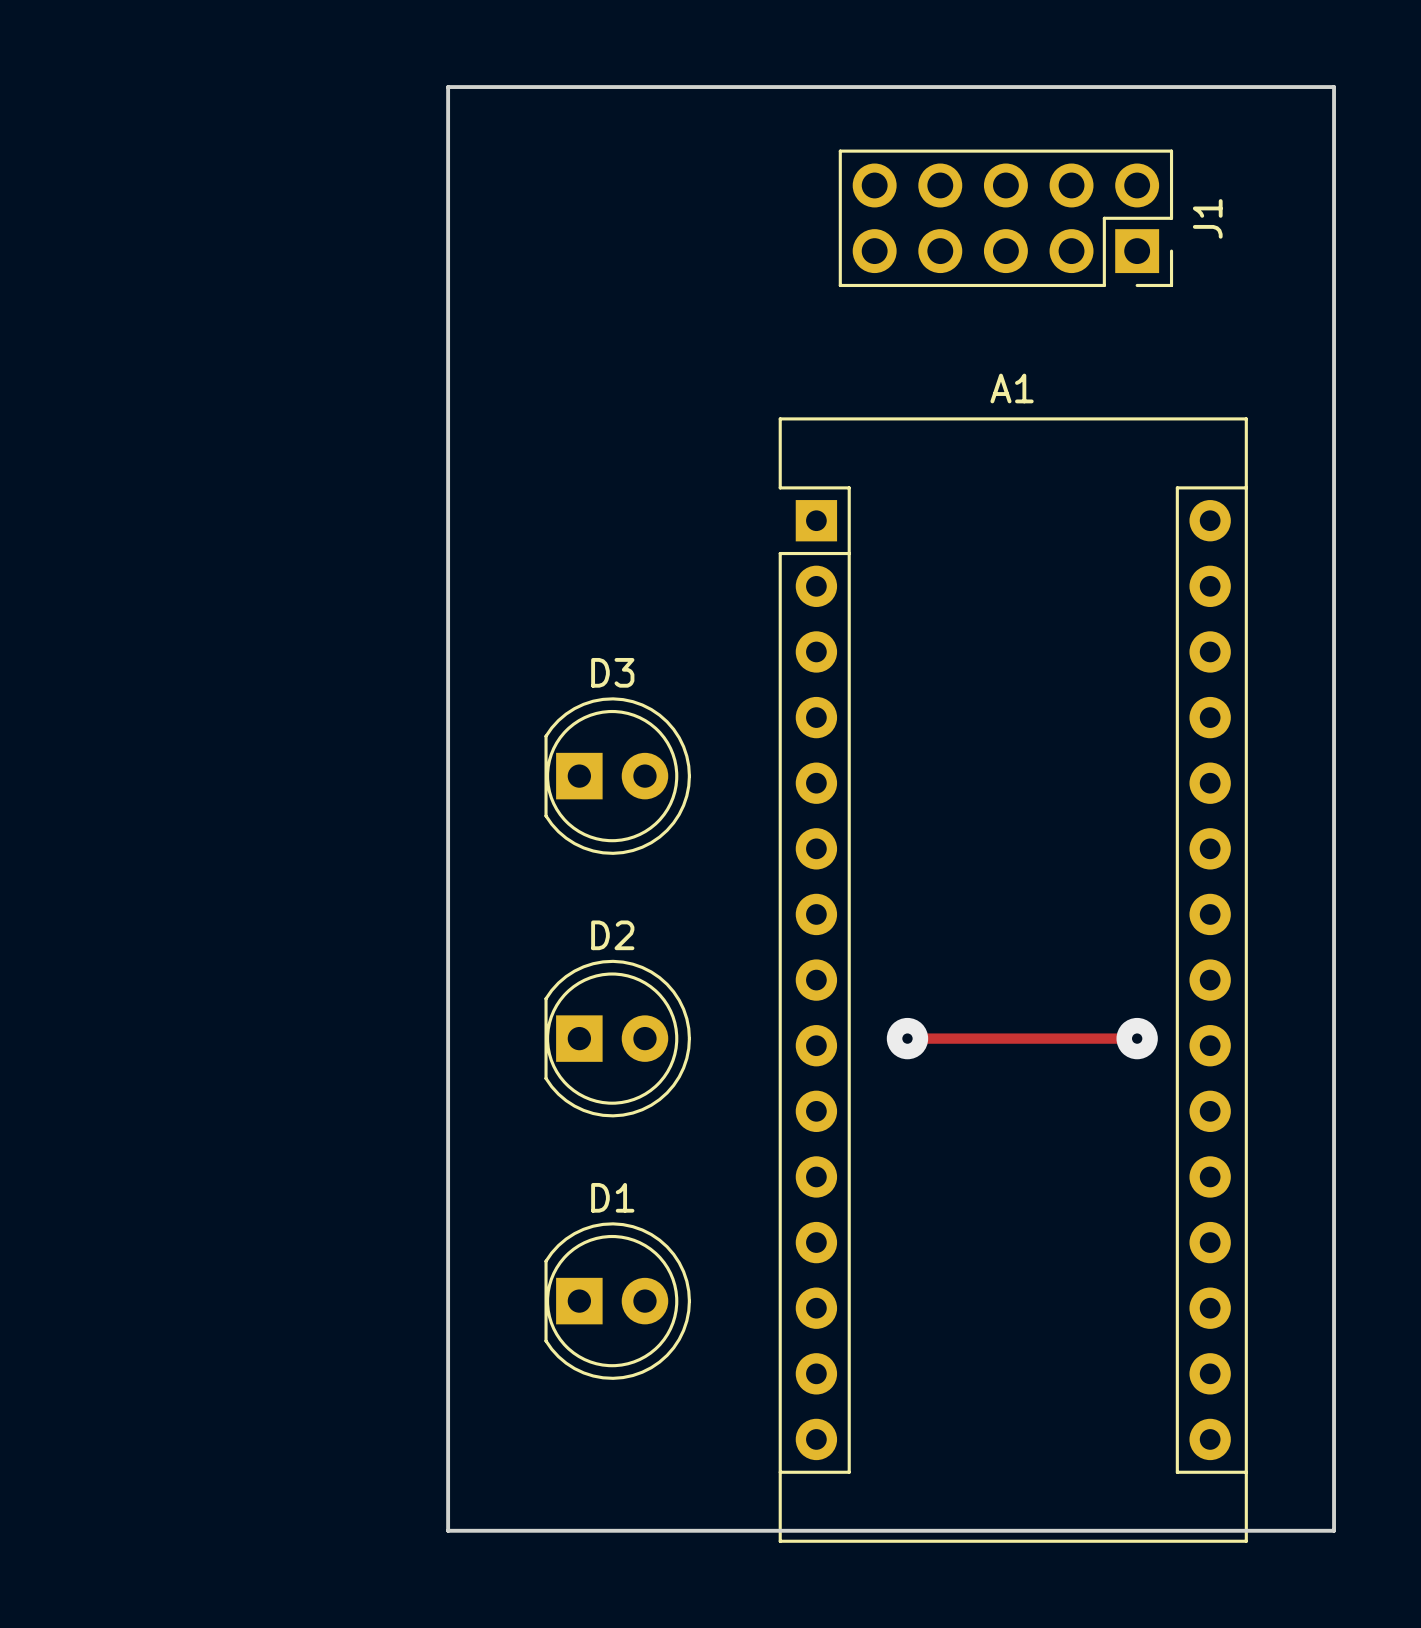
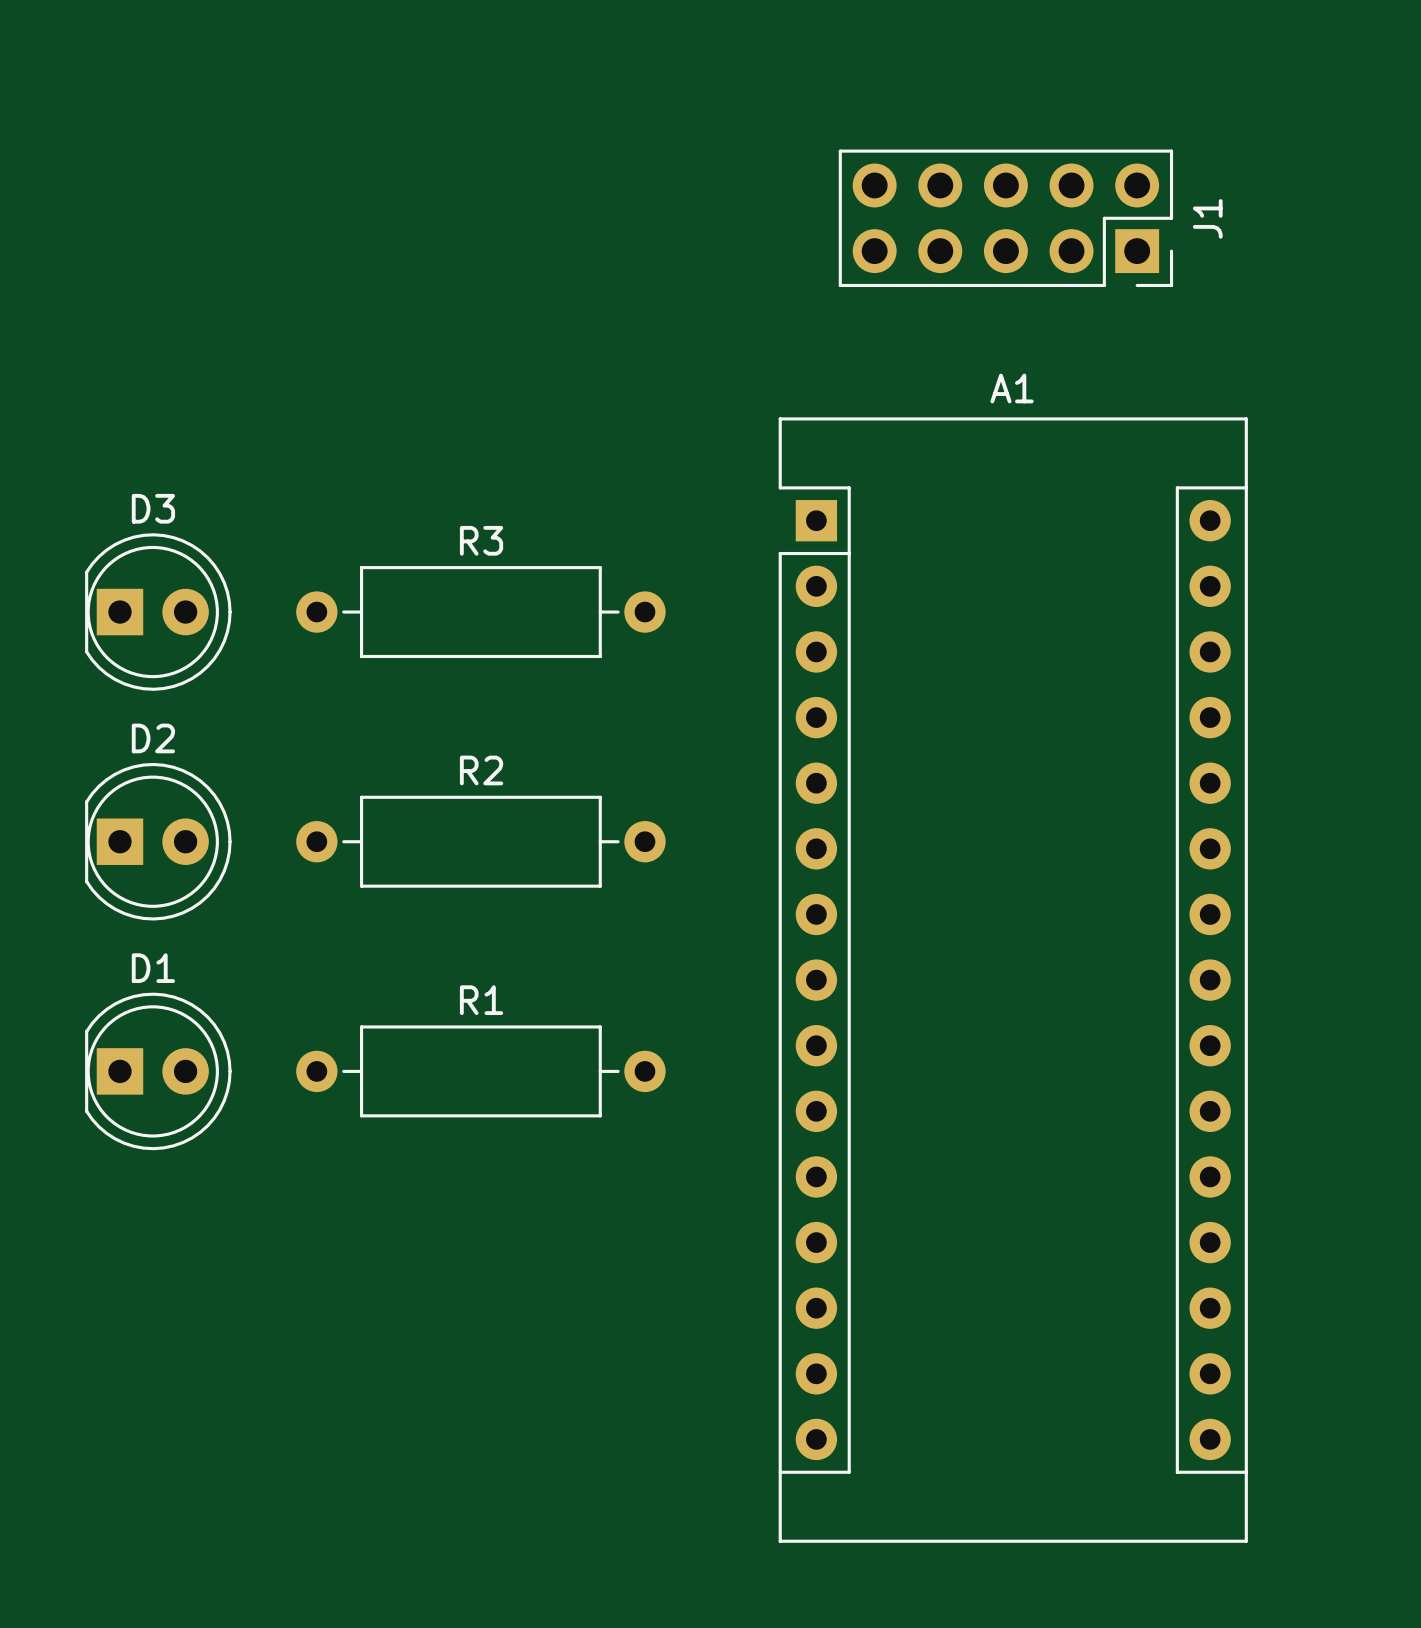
board edge: (448, 87) (1334, 87) (1334, 1530) (448, 1530) (448, 87) -> none
R3: none -> (480, 612)
D3 position: (617, 776) -> (158, 612)
R2: none -> (480, 841)
D2 position: (617, 1038) -> (158, 841)
track: (907, 1038) (1137, 1038) -> none
via: (907, 1038) -> none
via: (1137, 1038) -> none
R1: none -> (480, 1071)
D1 position: (617, 1301) -> (158, 1071)

